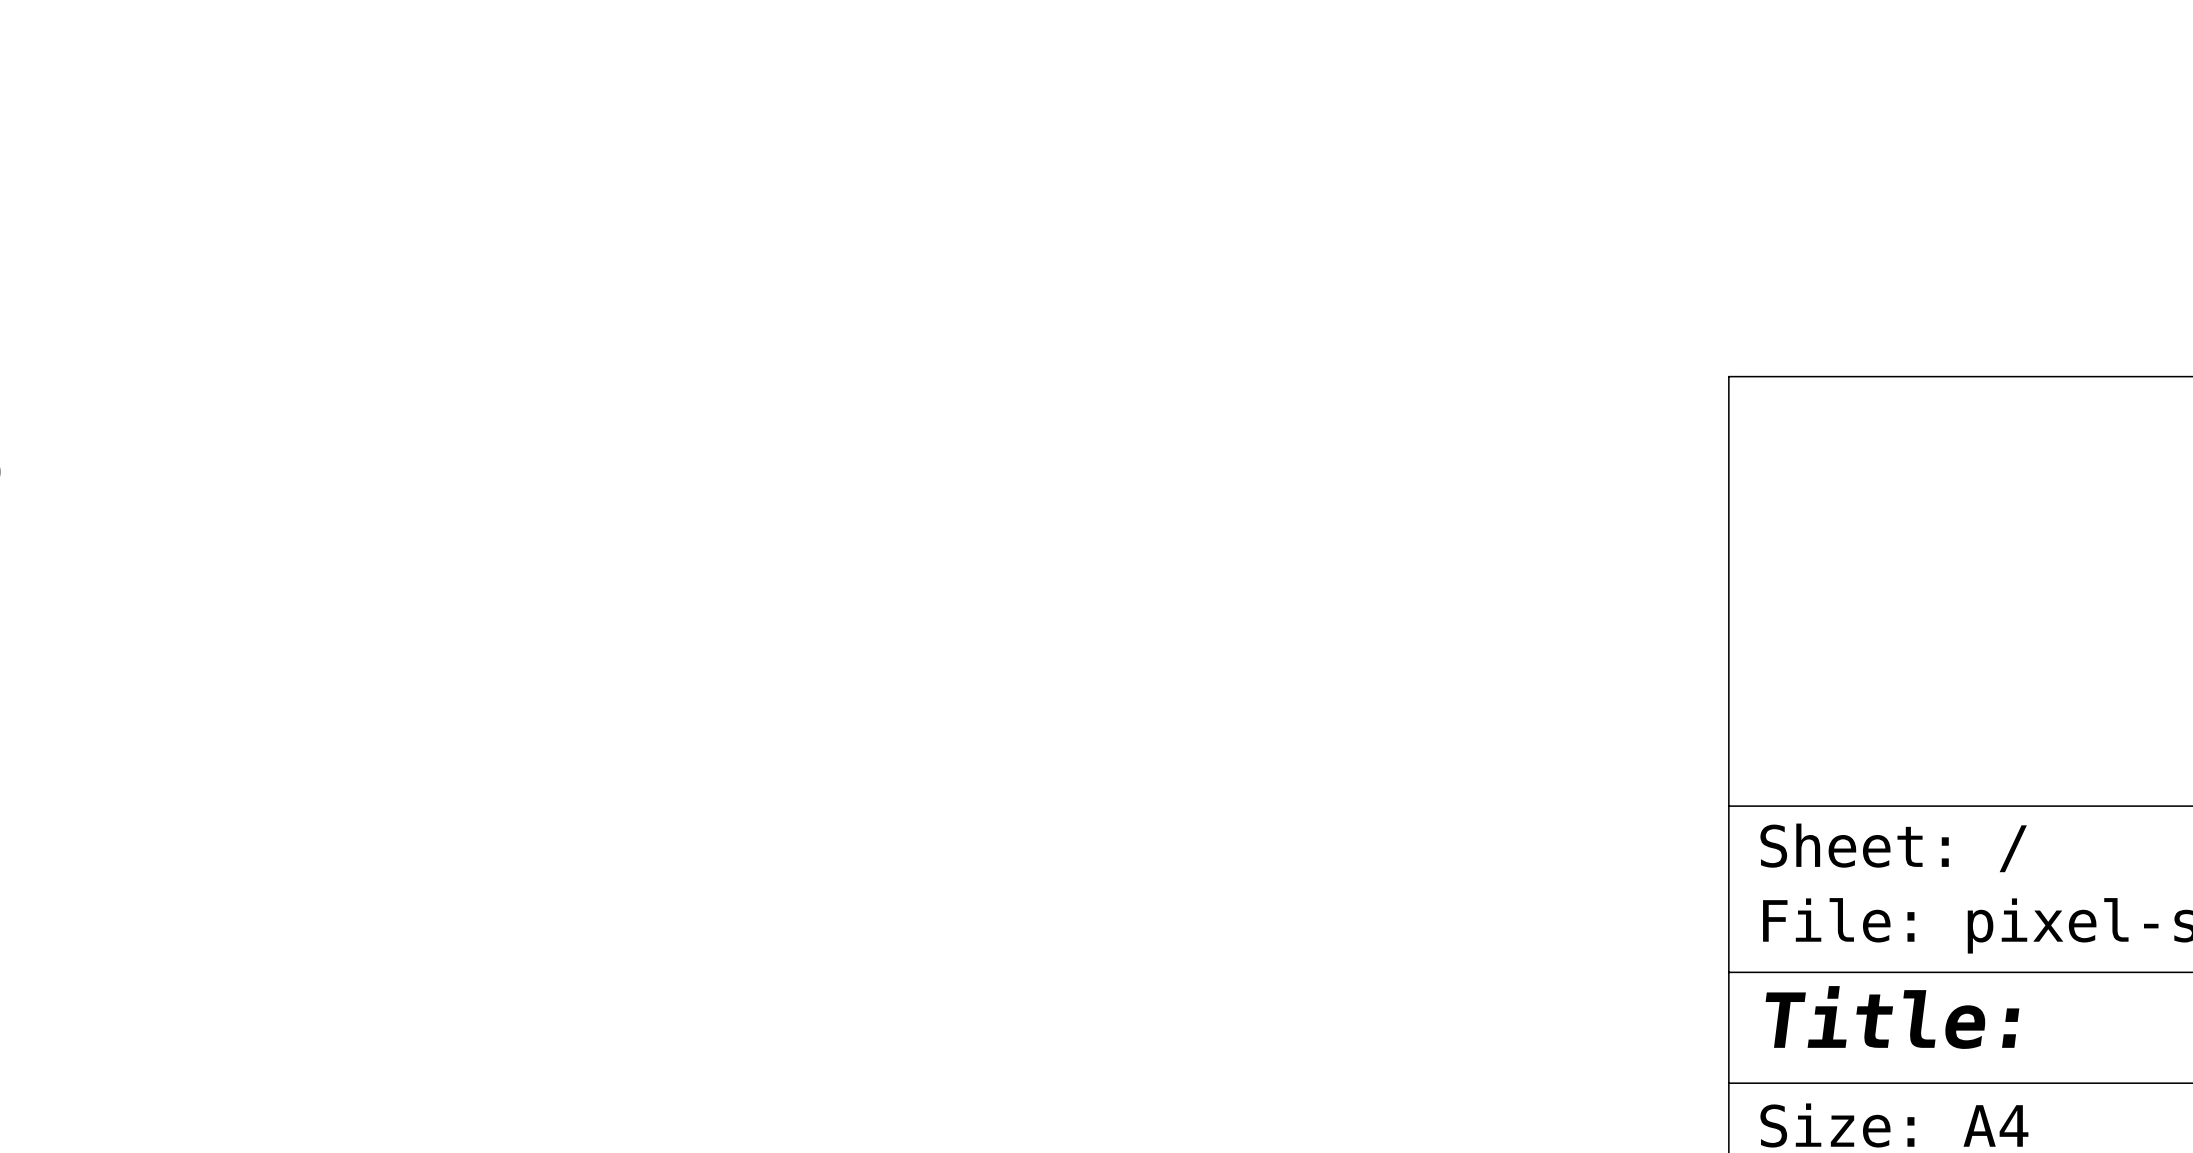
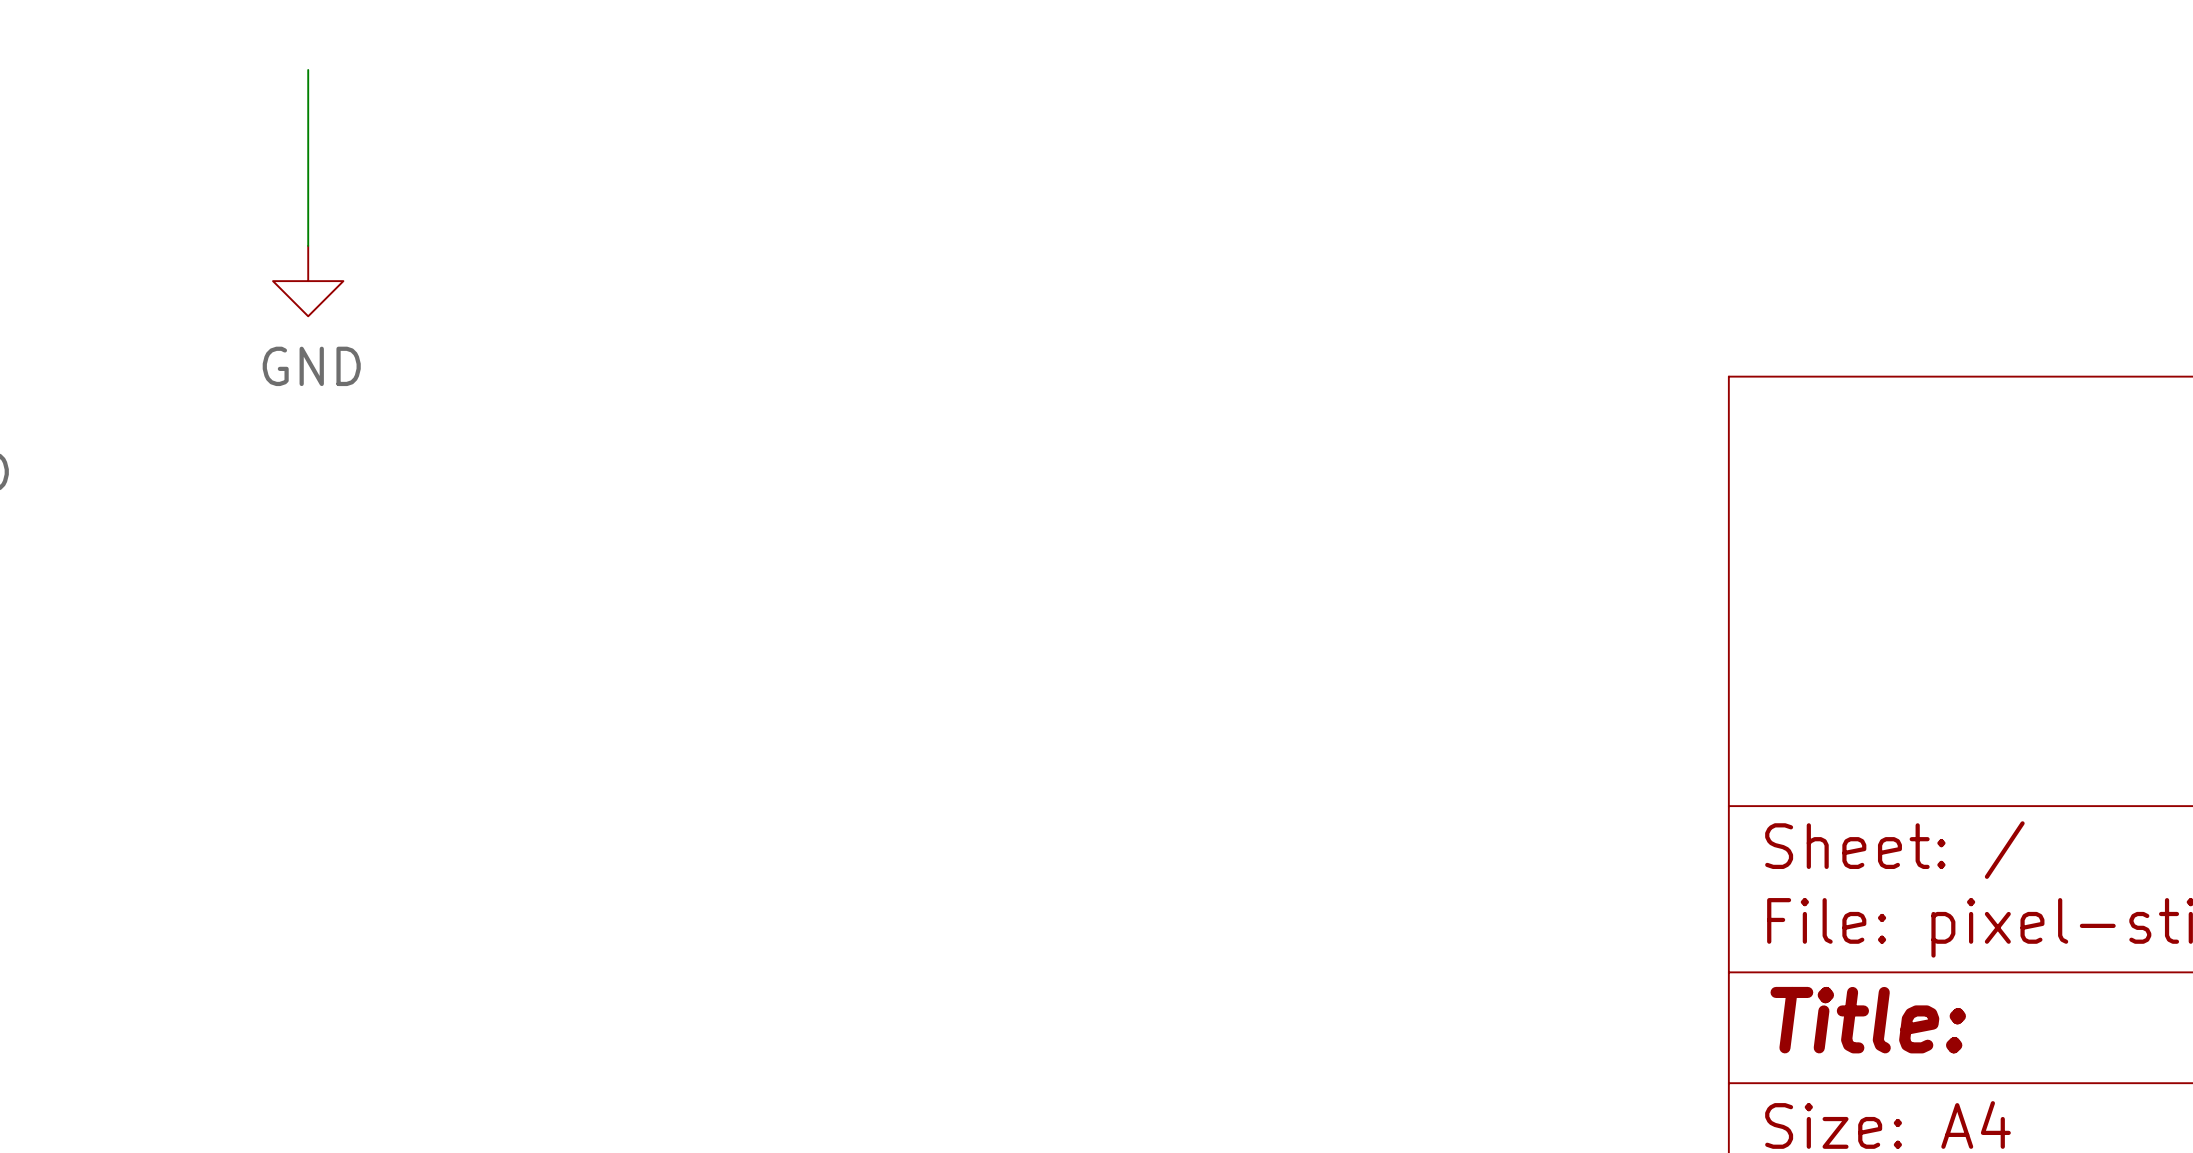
wire: none -> (308, 69) (308, 245)
power symbol: none -> GND (308, 281)

